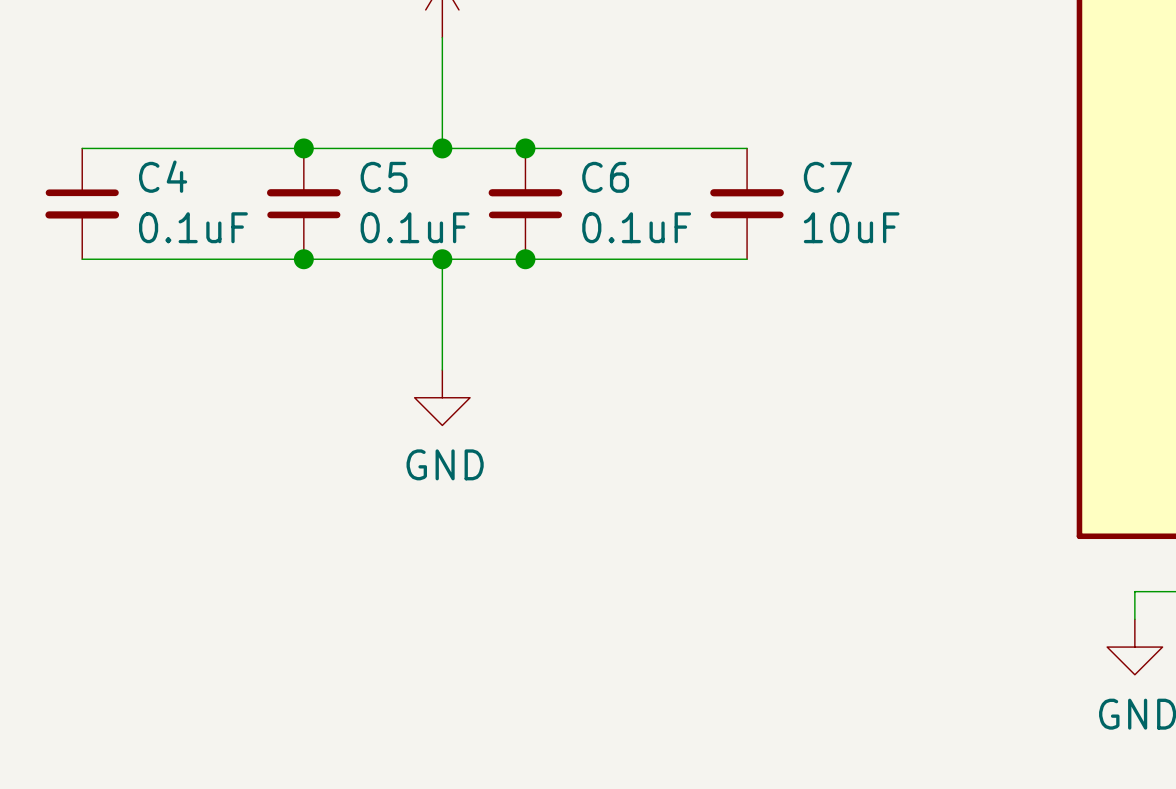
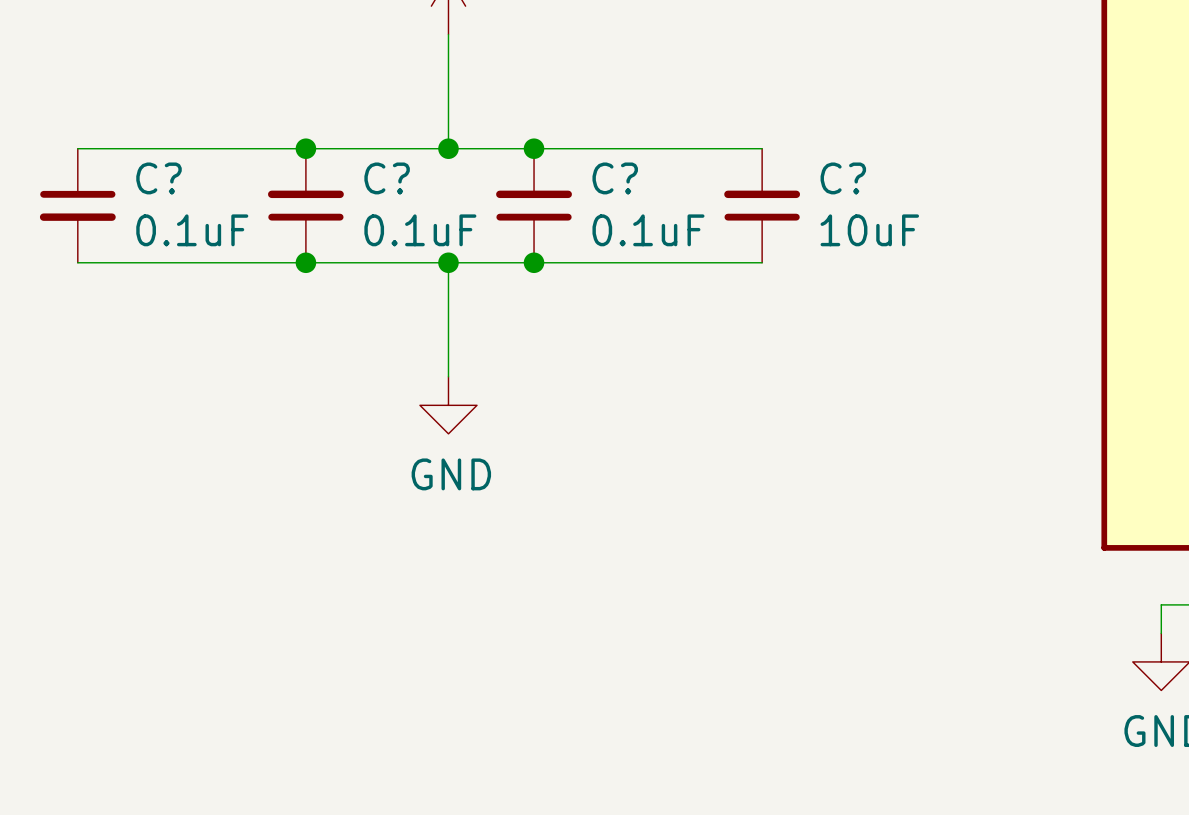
C4 name: C4 (163, 176) -> C? (159, 178)
C5 name: C5 (384, 177) -> C? (387, 178)
C6 name: C6 (605, 177) -> C? (615, 178)
C7 name: C7 (827, 177) -> C? (843, 178)

